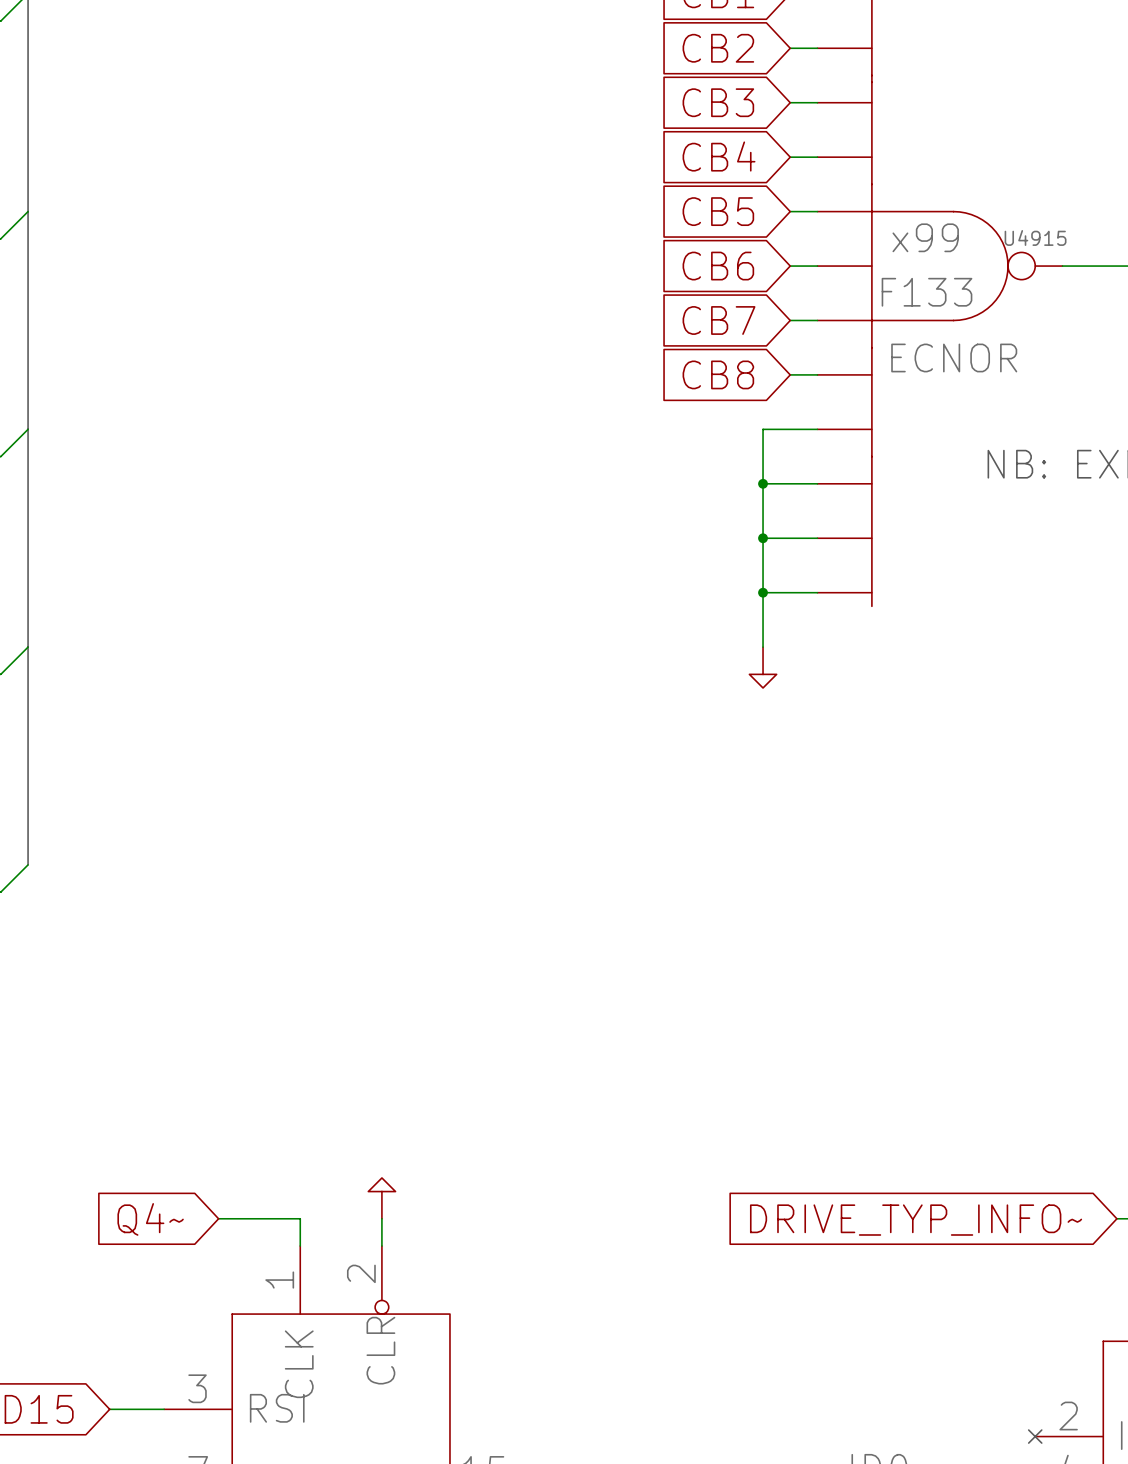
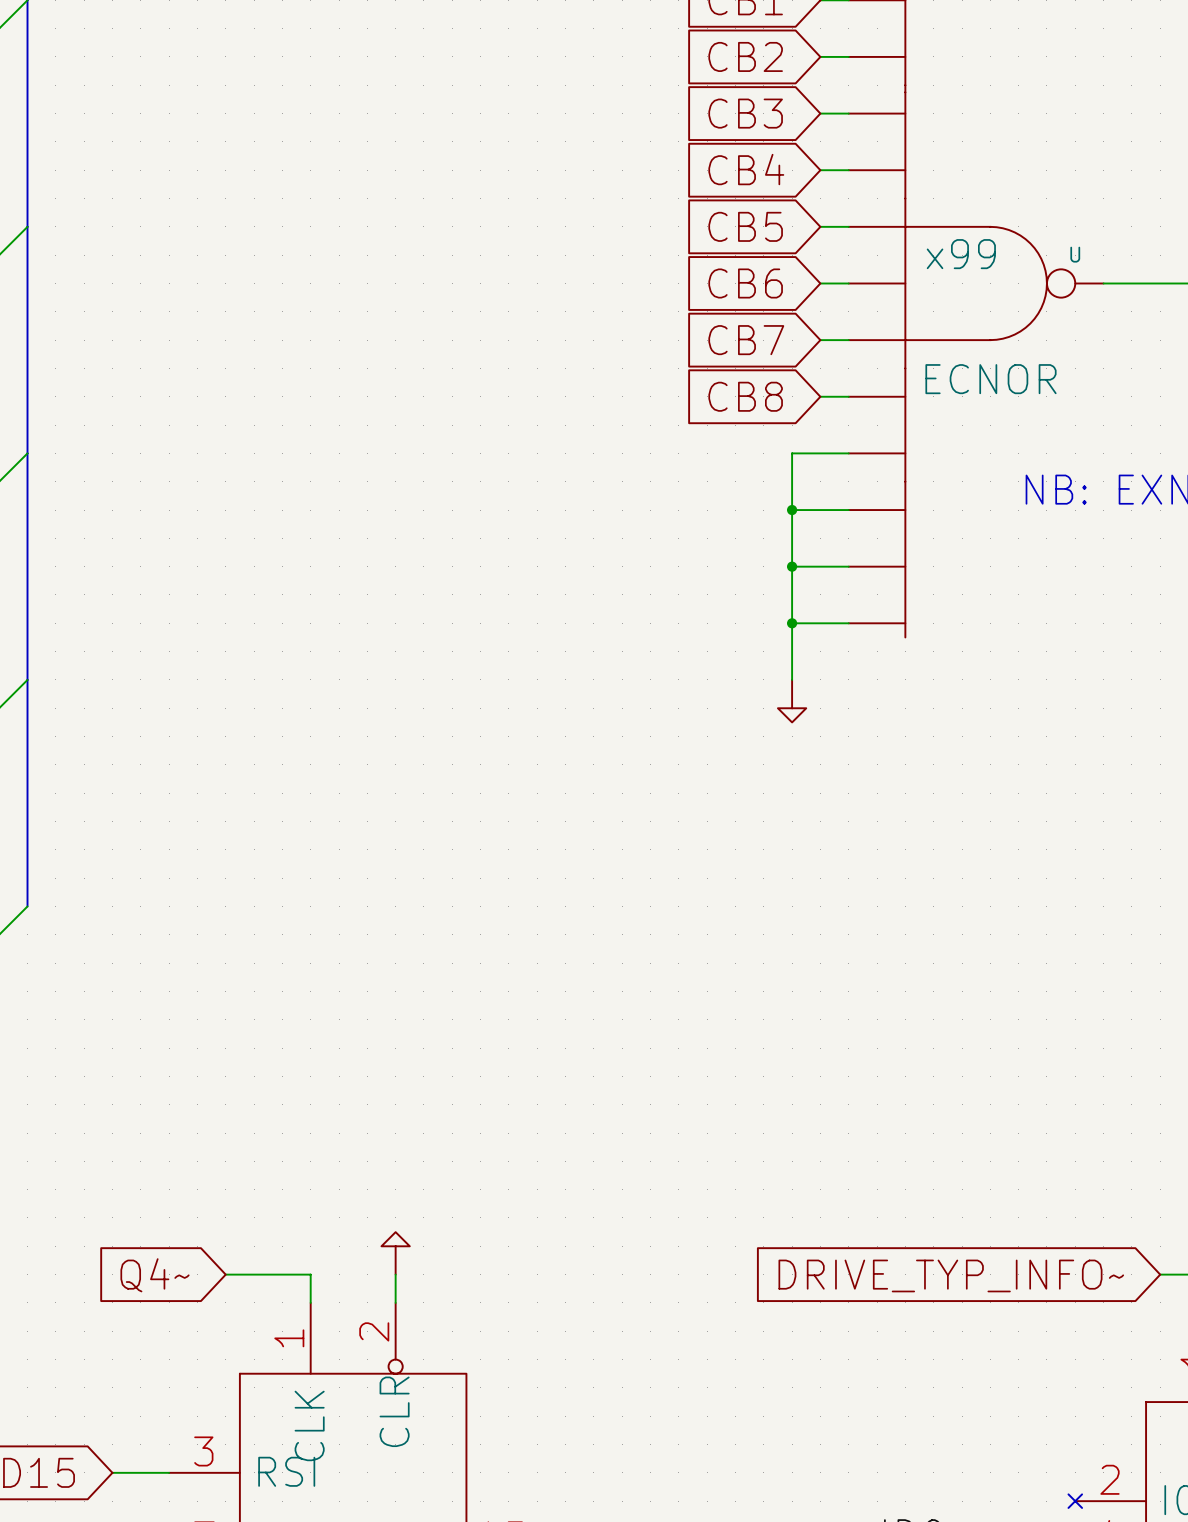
U4915 name: U4915 (1035, 237) -> U (1075, 254)
U4915 value: F133 (926, 292) -> none

